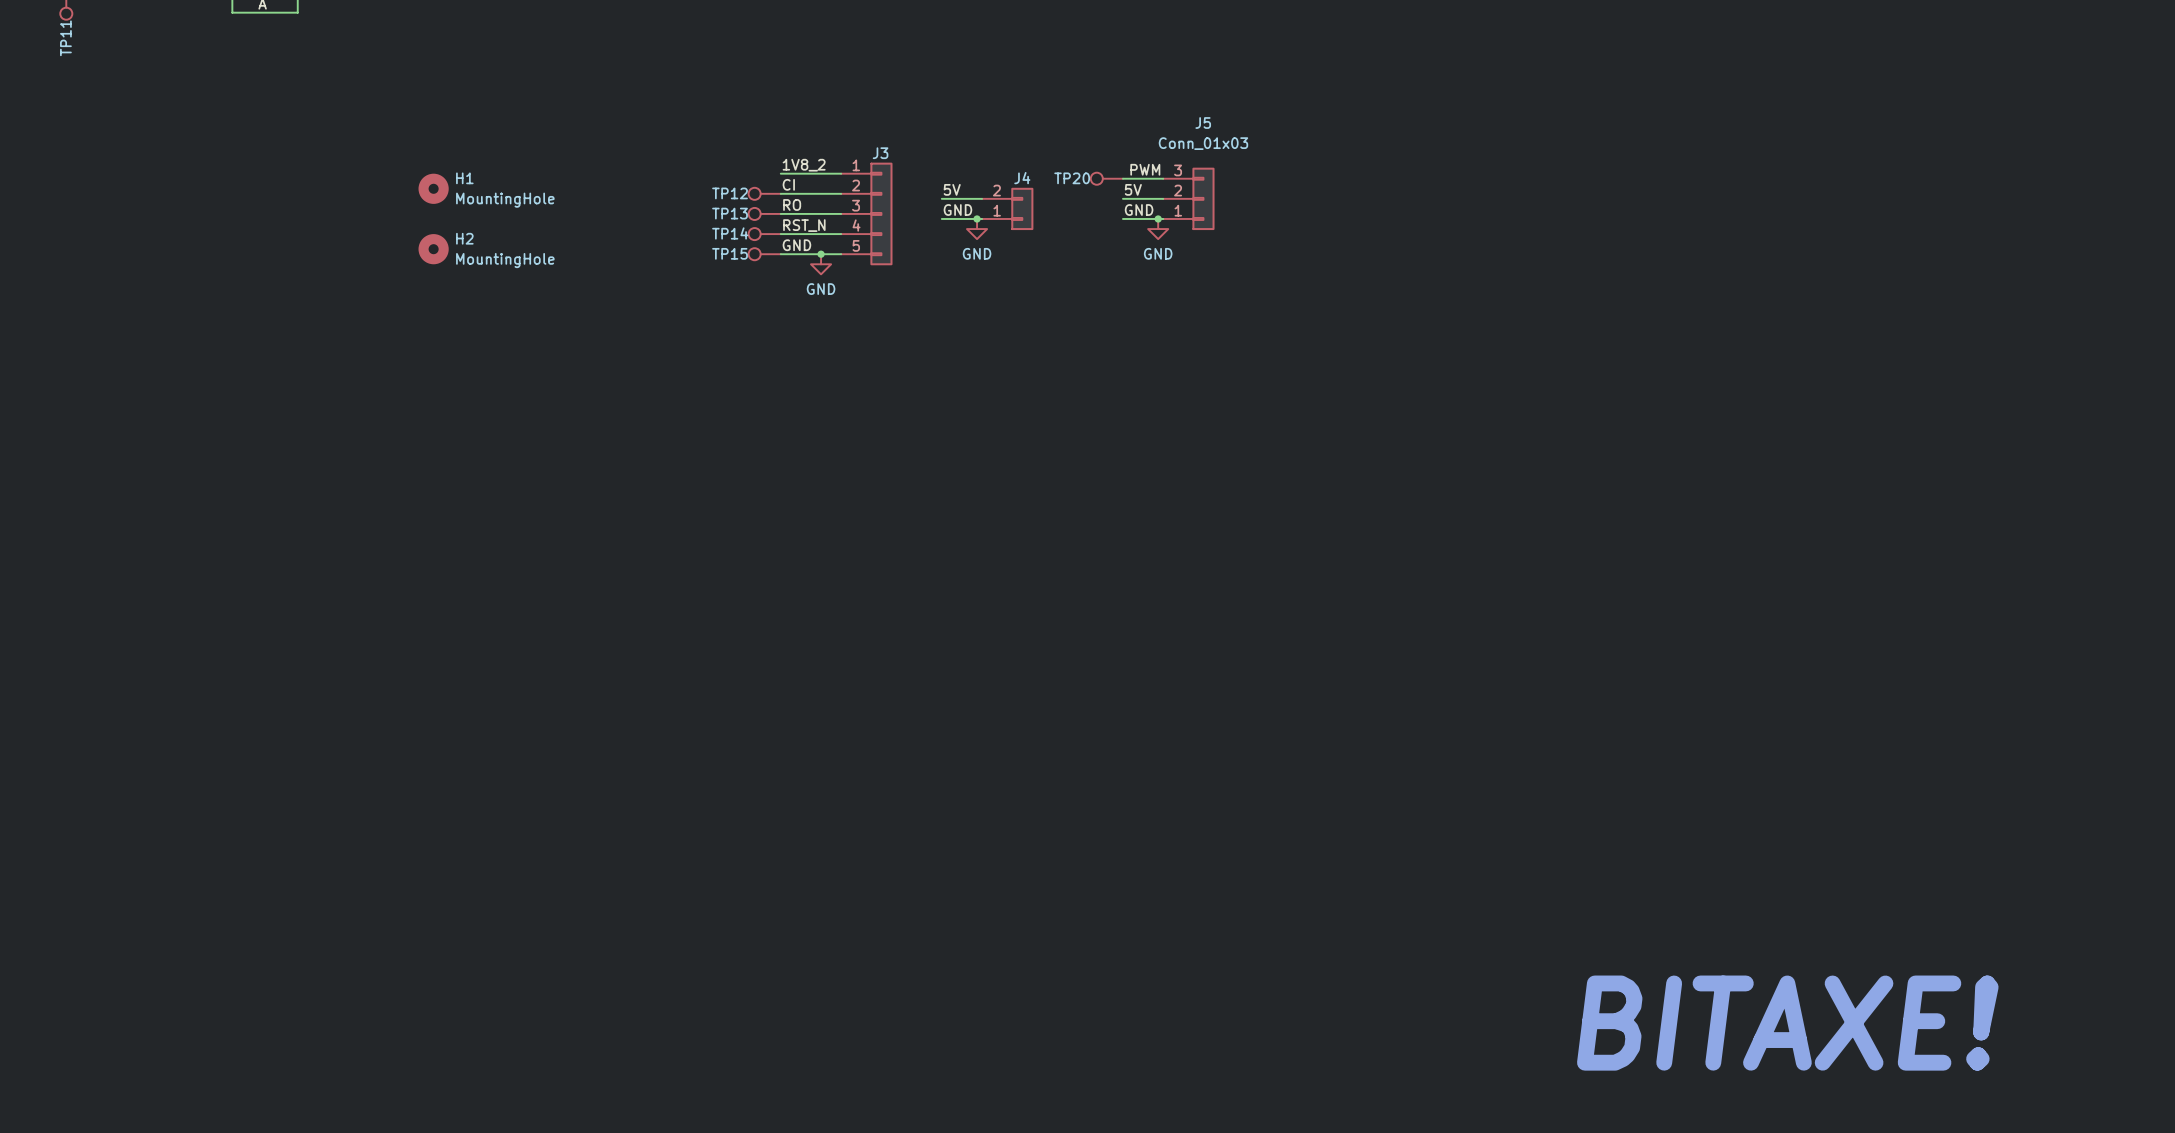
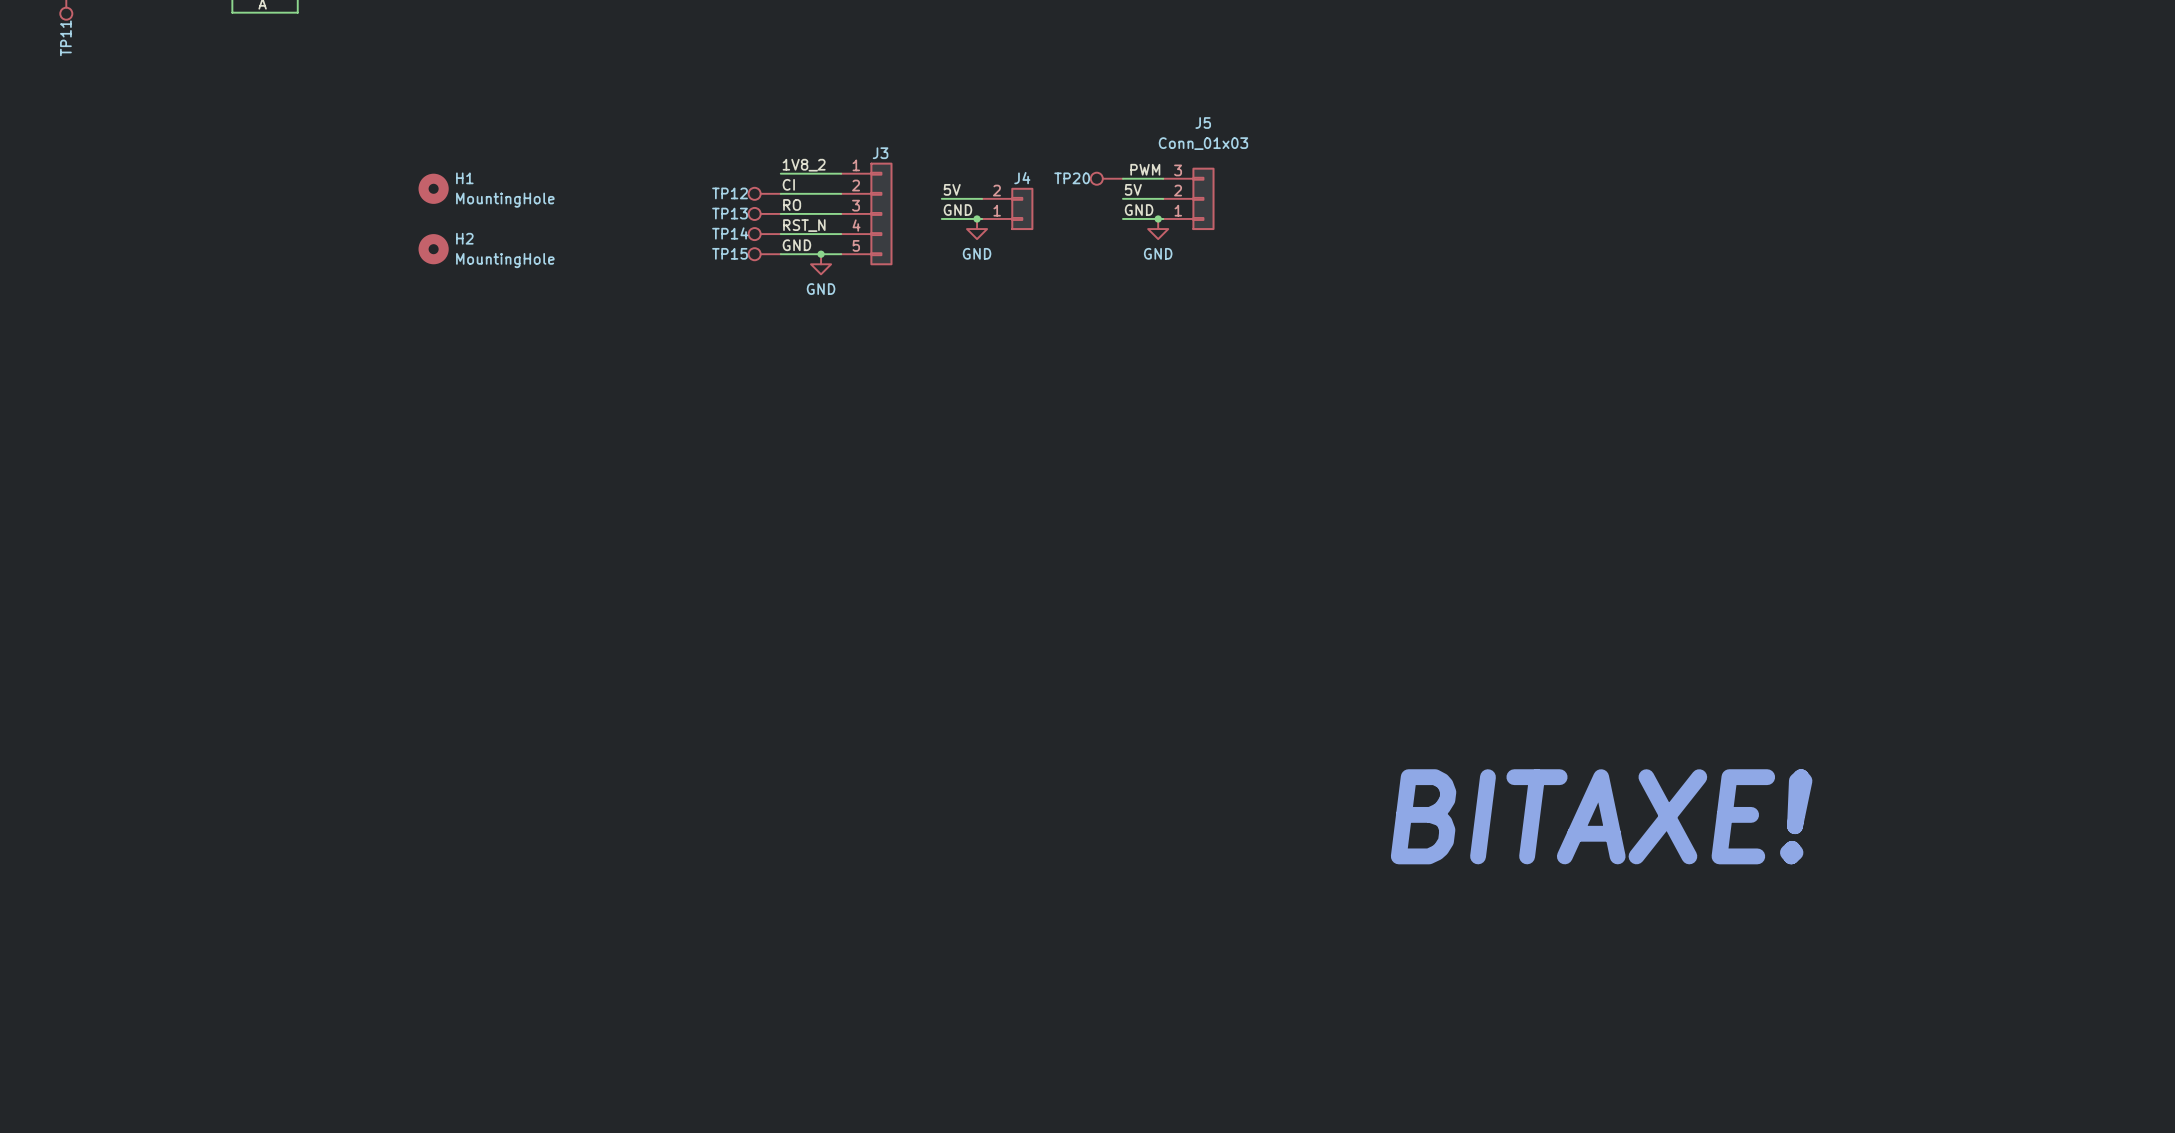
text: none -> BITAXE! (1601, 816)
text: BITAXE! (1787, 1023) -> none

